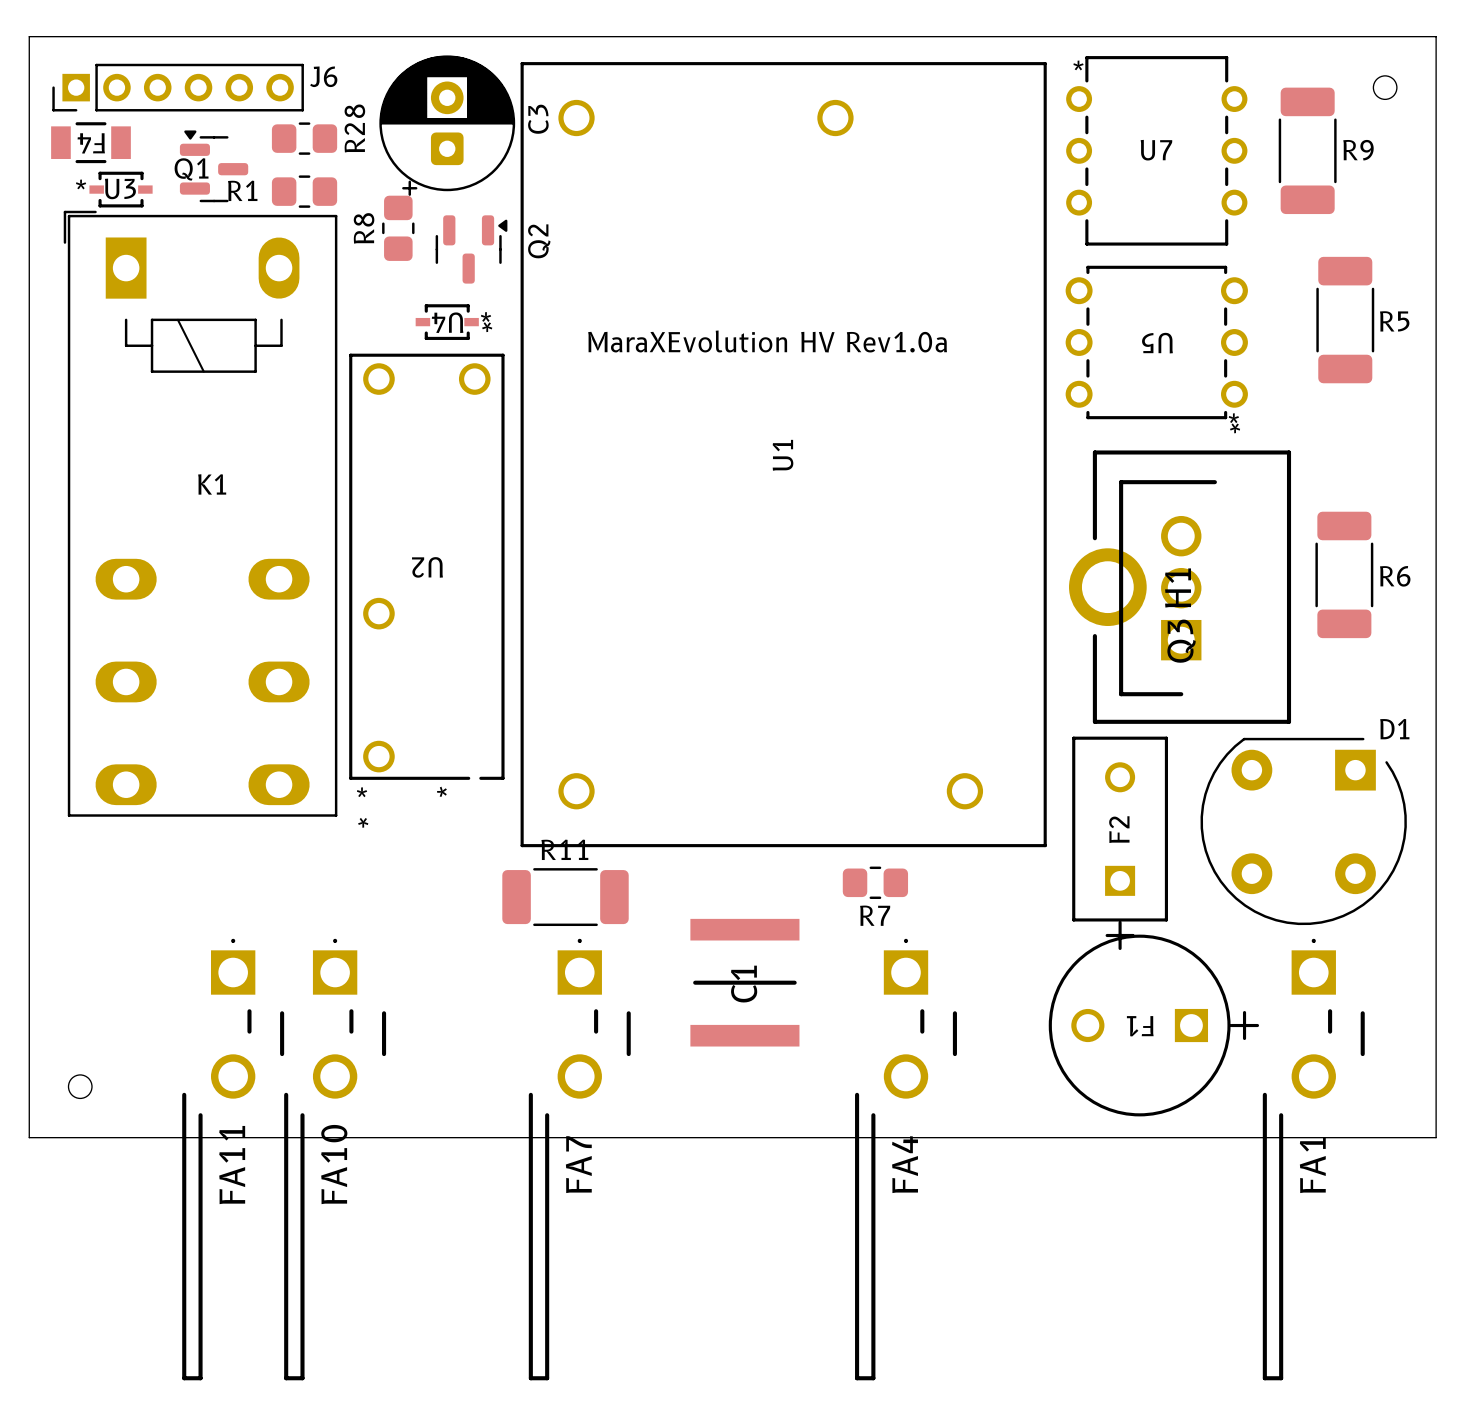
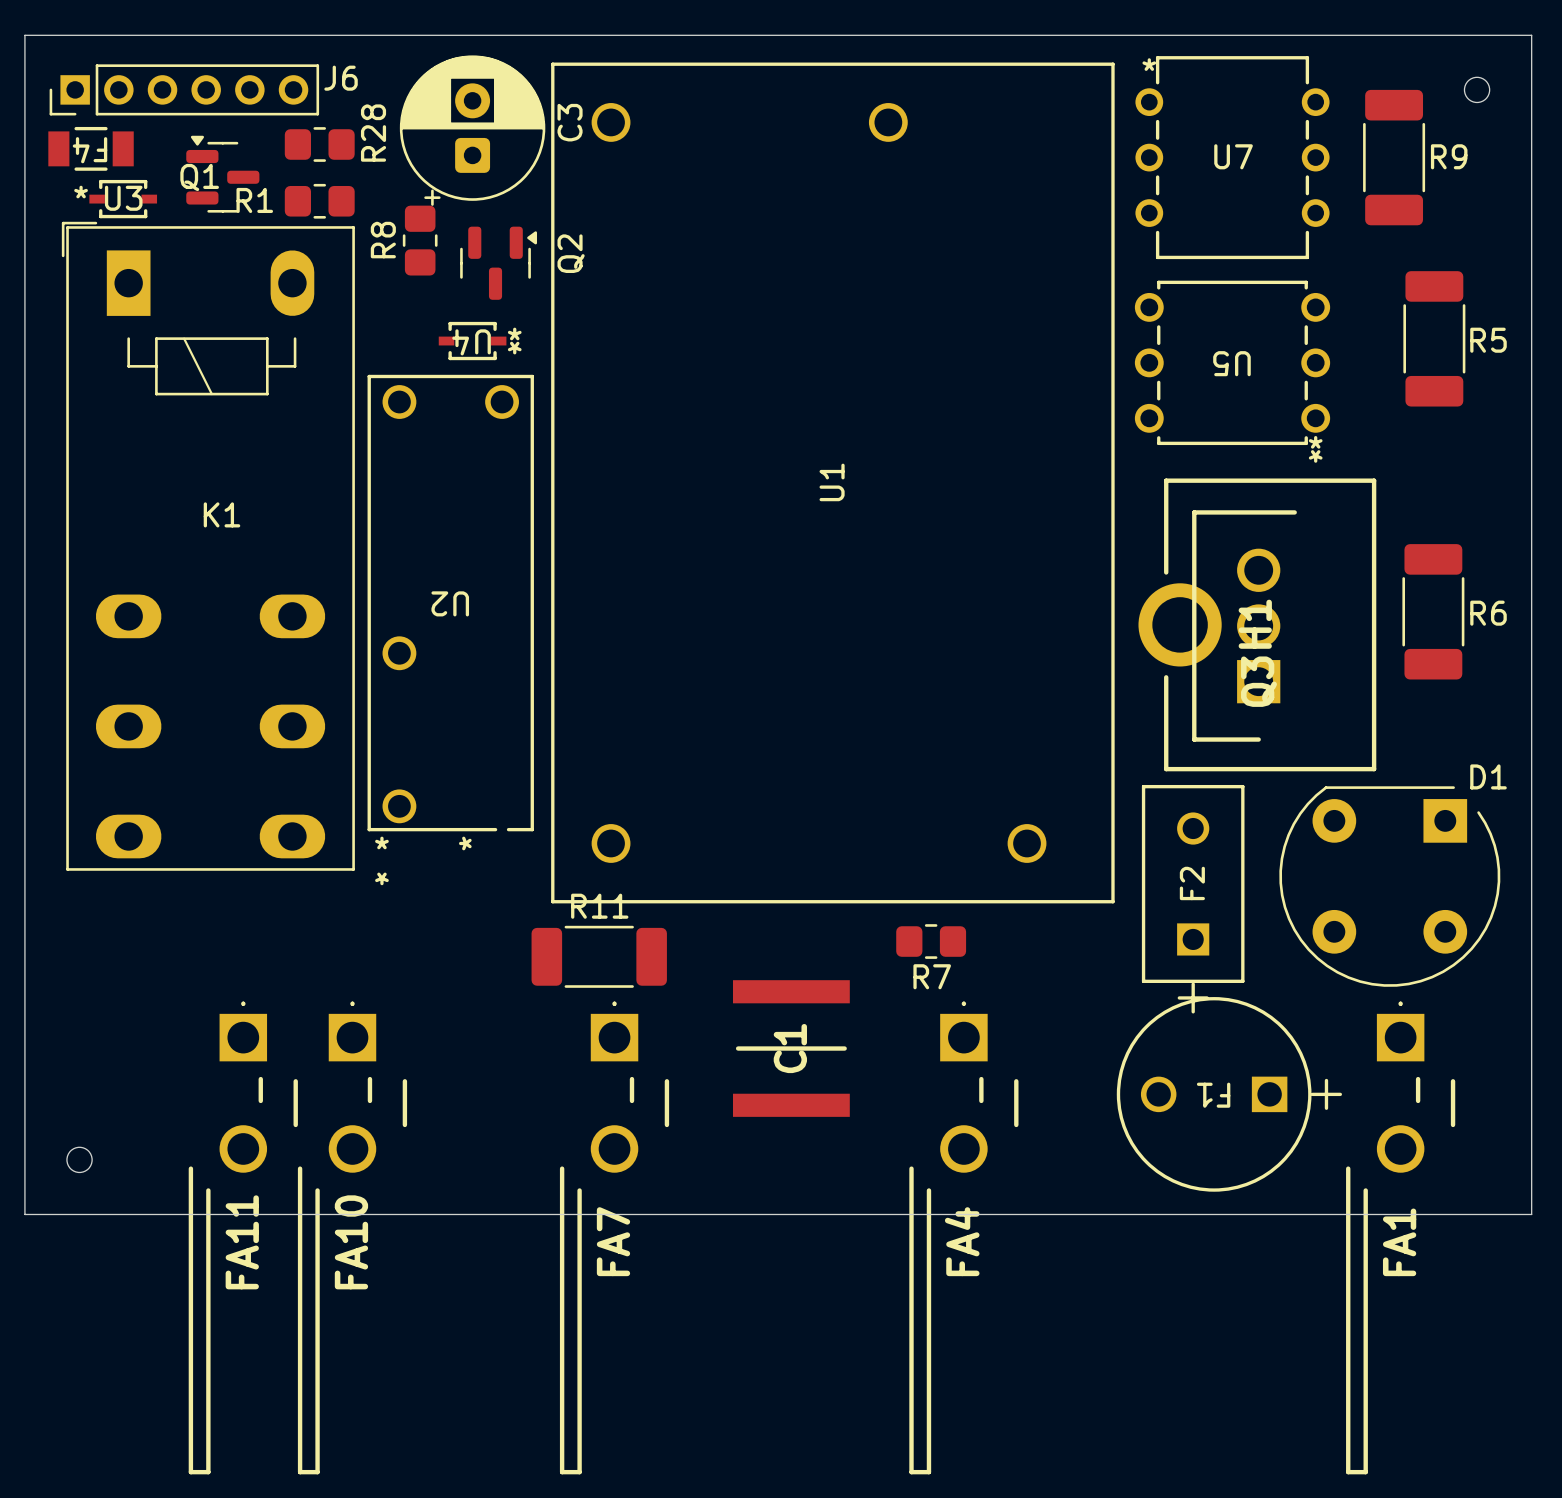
text: MaraXEvolution HV Rev1.0a (767, 341) -> none

